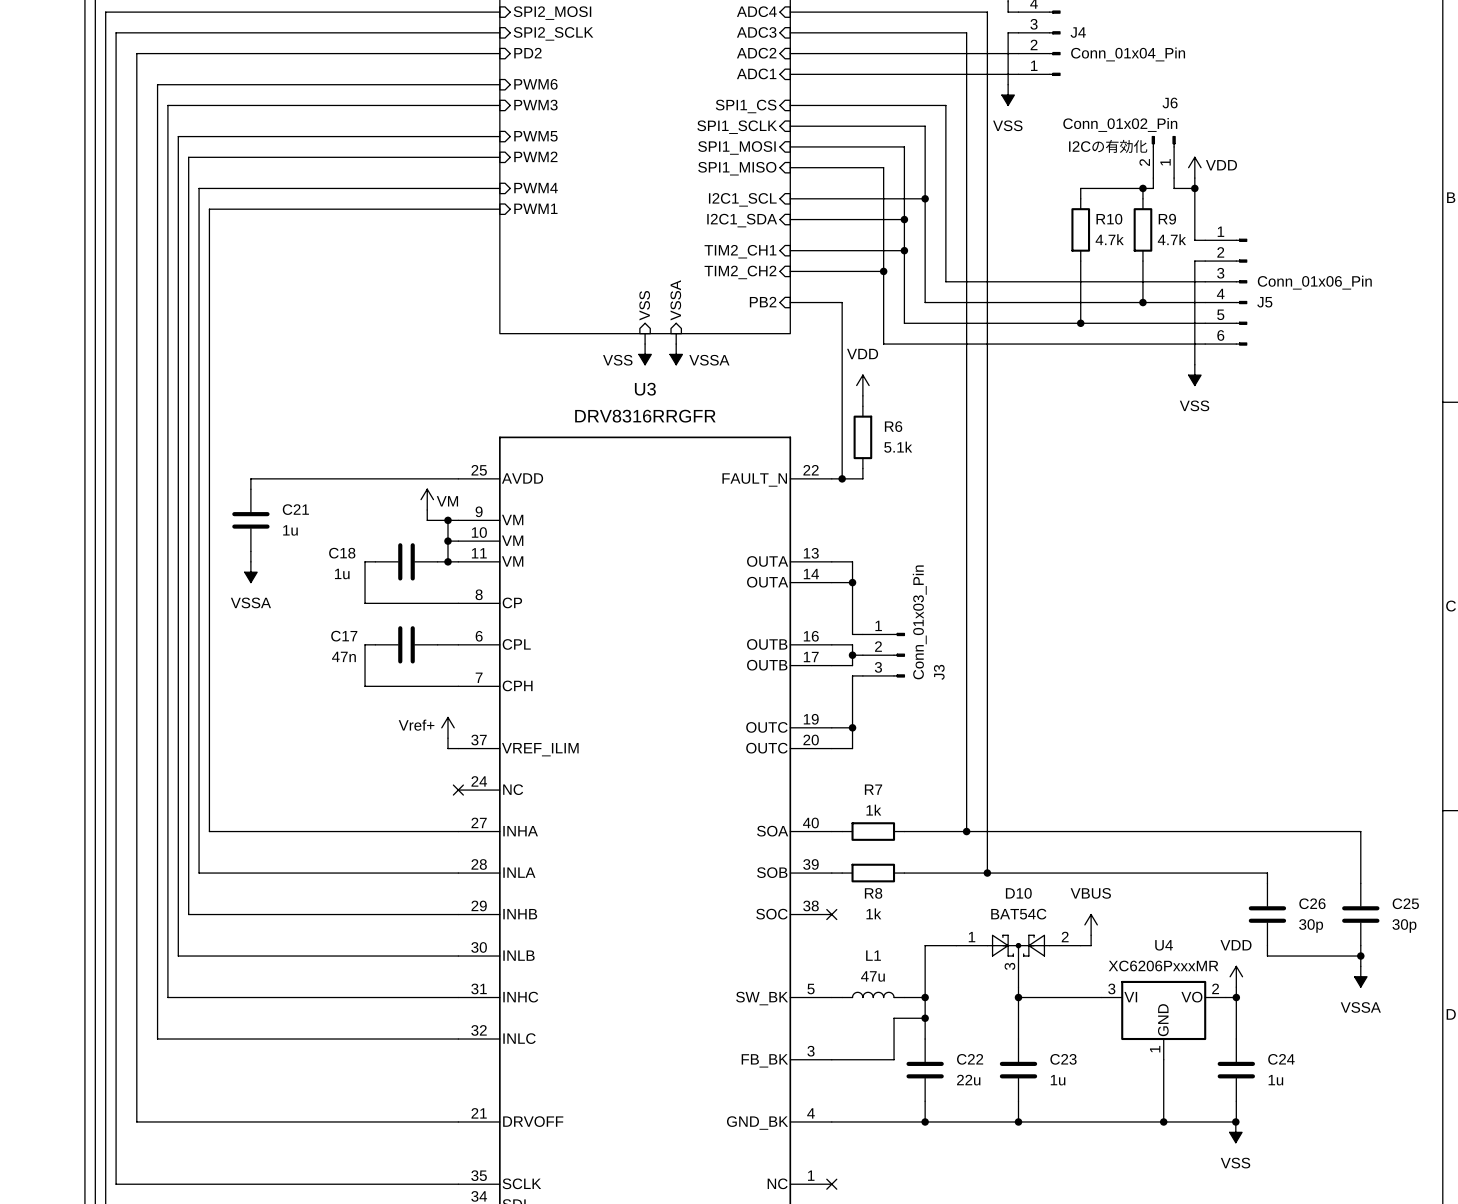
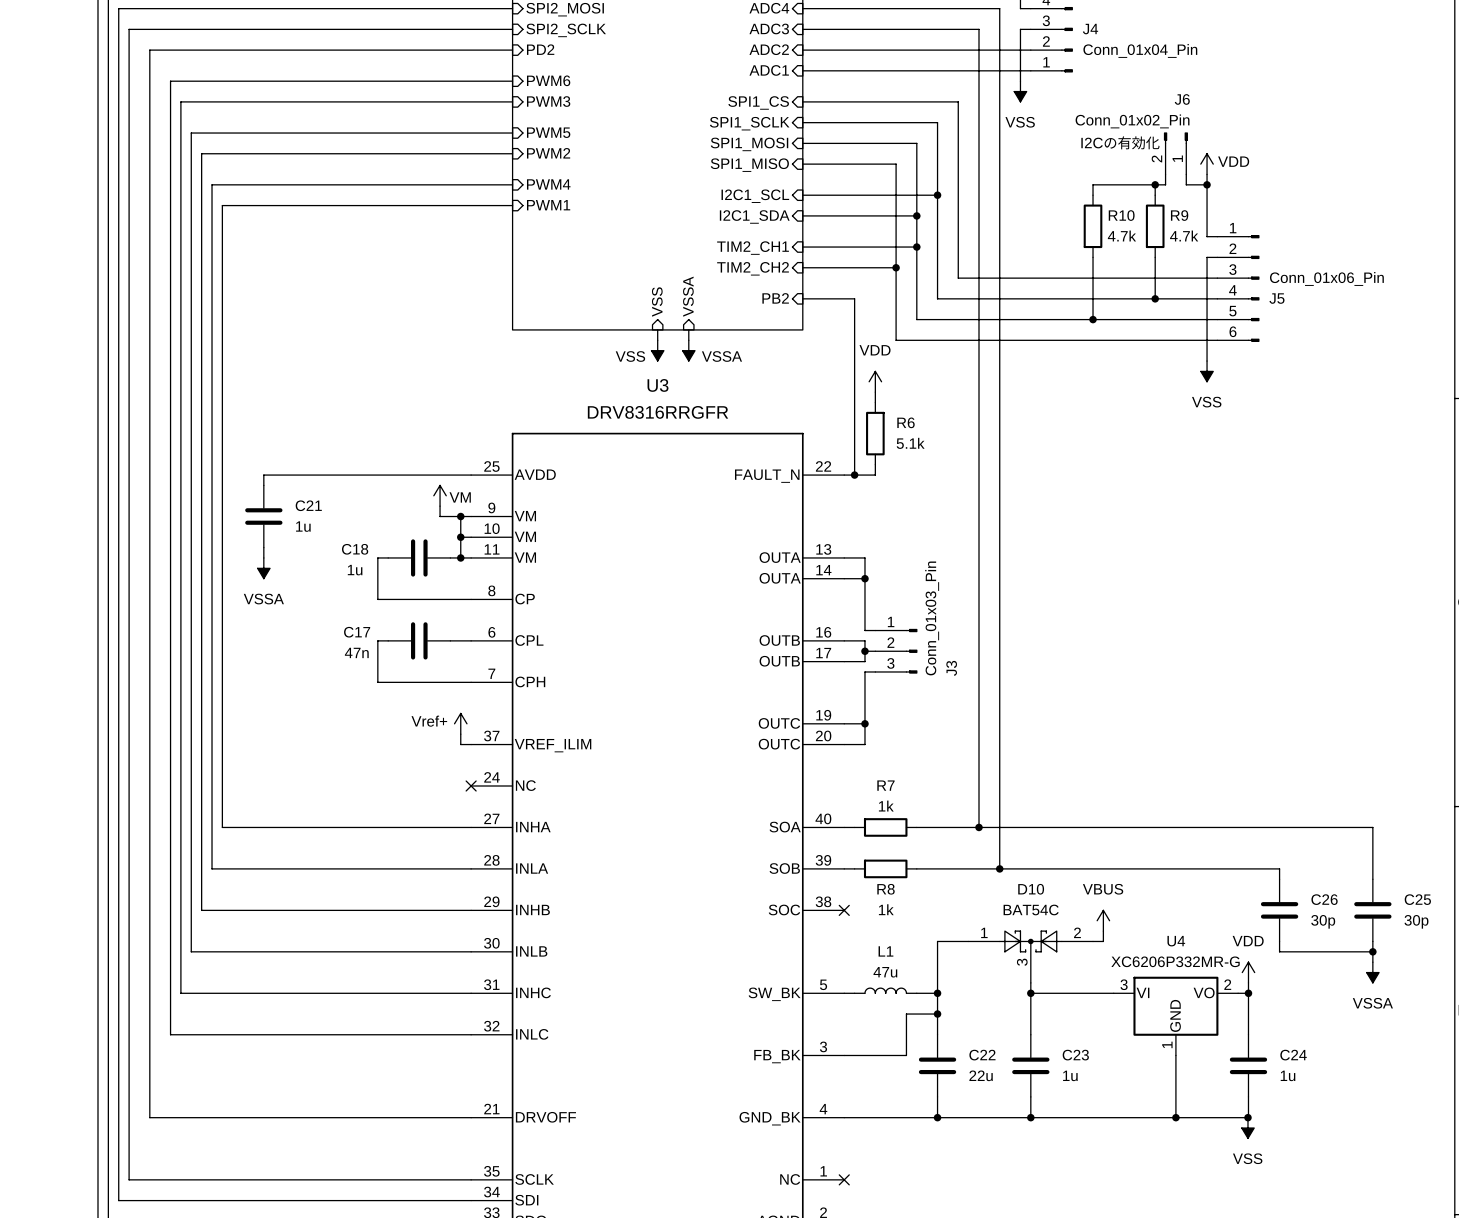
U4 value: XC6206PxxxMR (1163, 966) -> XC6206P332MR-G (1175, 961)

